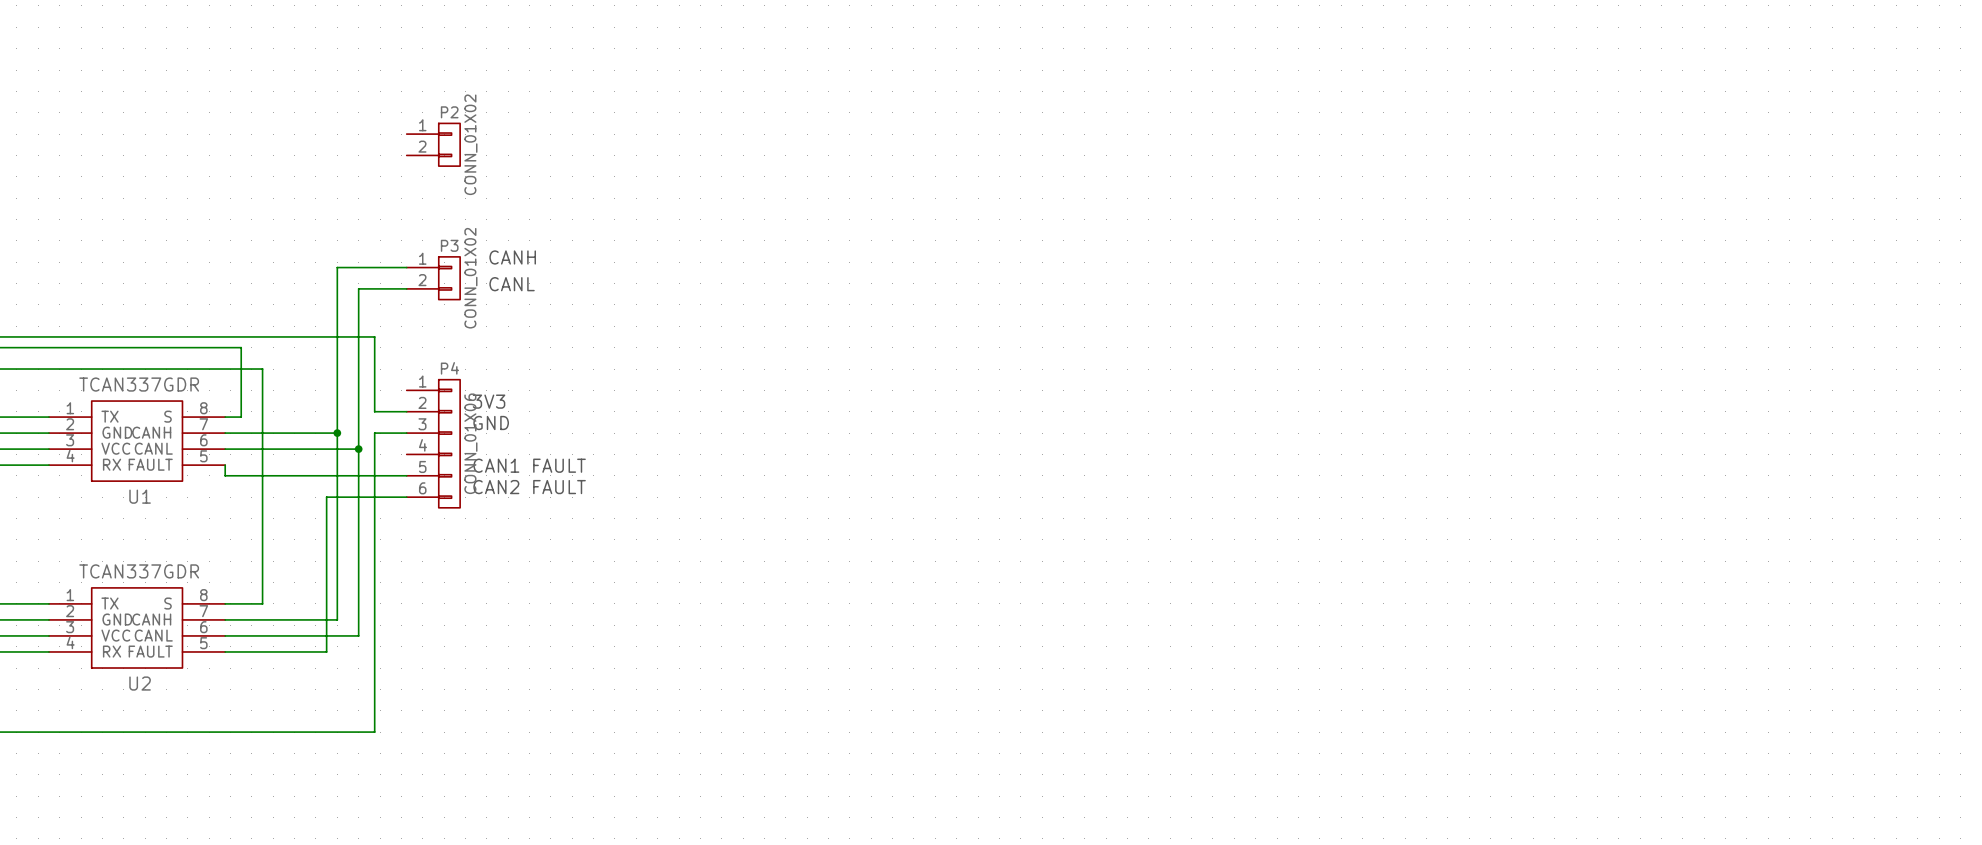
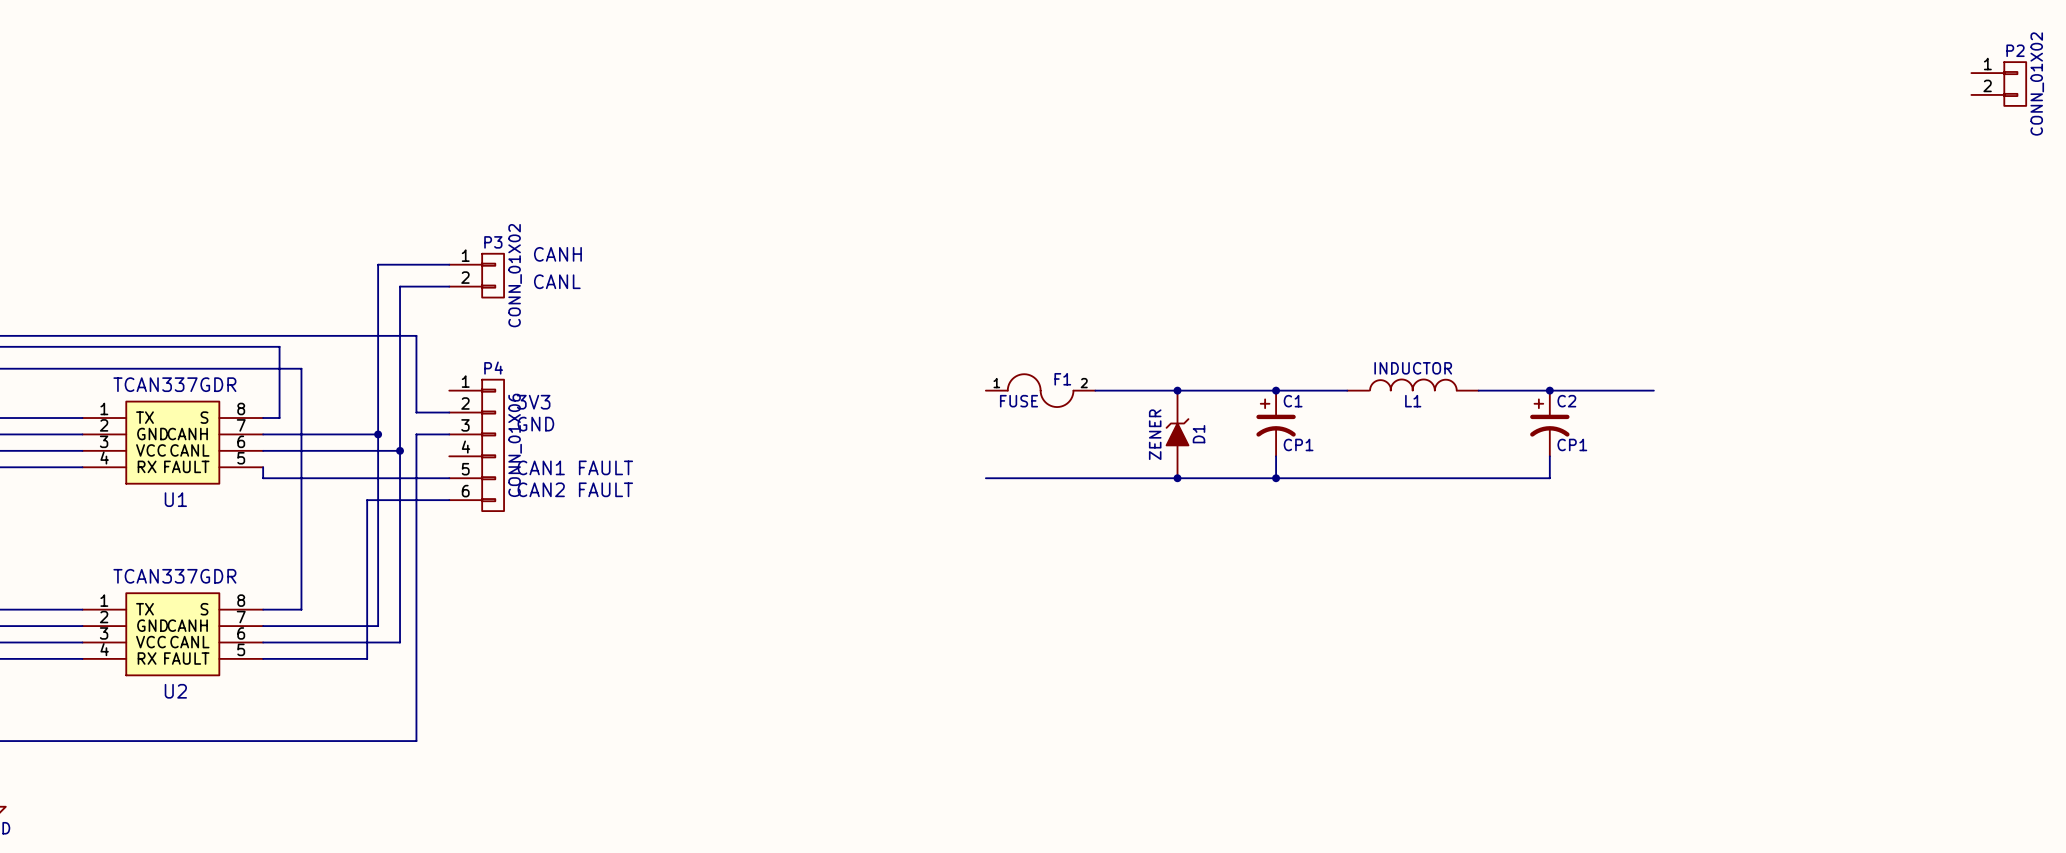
P2 position: (433, 144) -> (1998, 84)
L1: none -> INDUCTOR (1412, 385)
F1: none -> FUSE (1040, 390)
wire: none -> (1095, 390) (1347, 390)
junction: none -> (1177, 390)
junction: none -> (1276, 390)
wire: none -> (1478, 390) (1653, 390)
junction: none -> (1549, 390)
C1: none -> CP1 (1276, 423)
C2: none -> CP1 (1549, 423)
D1: none -> ZENER (1177, 434)
wire: none -> (1276, 456) (1276, 478)
wire: none -> (1549, 456) (1549, 478) (985, 478)
junction: none -> (1177, 478)
junction: none -> (1276, 478)

